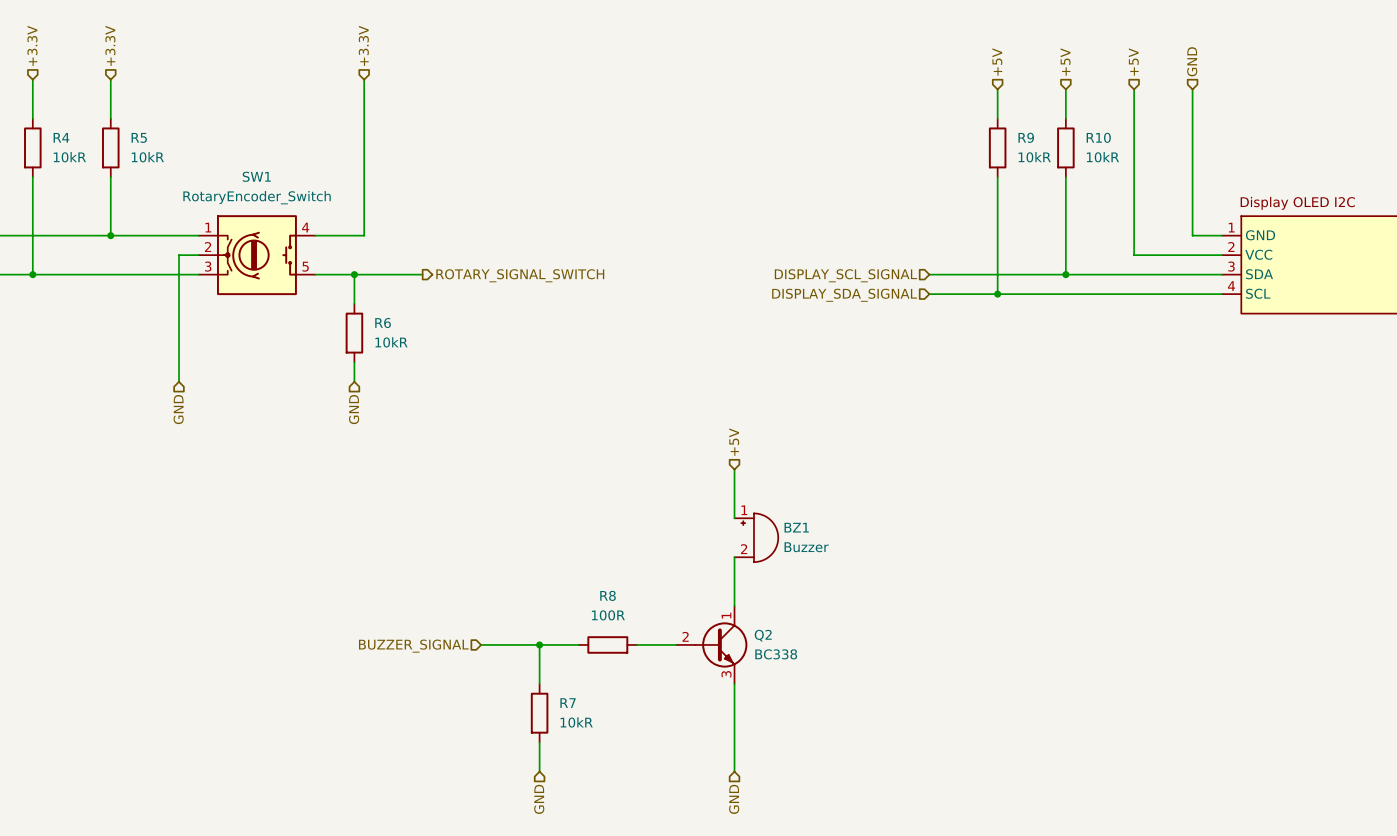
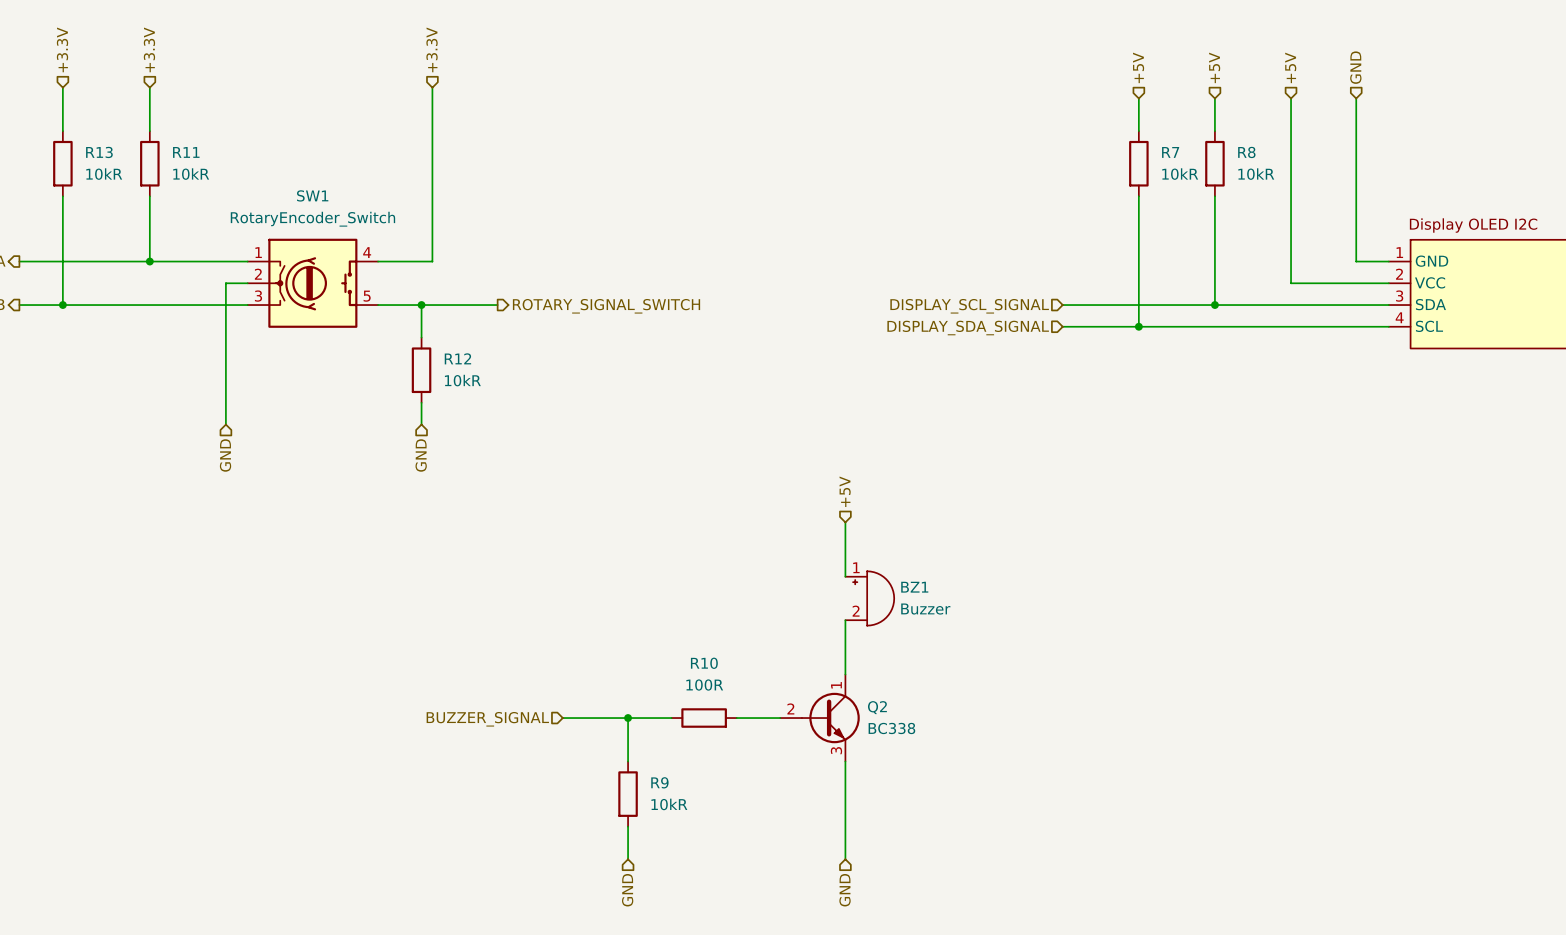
R4 name: R4 (61, 137) -> R13 (99, 152)
R5 name: R5 (139, 137) -> R11 (186, 152)
R9 name: R9 (1026, 137) -> R7 (1170, 152)
R10 name: R10 (1098, 137) -> R8 (1246, 152)
R6 name: R6 (383, 323) -> R12 (457, 358)
R8 name: R8 (608, 595) -> R10 (704, 663)
R7 name: R7 (568, 703) -> R9 (659, 782)

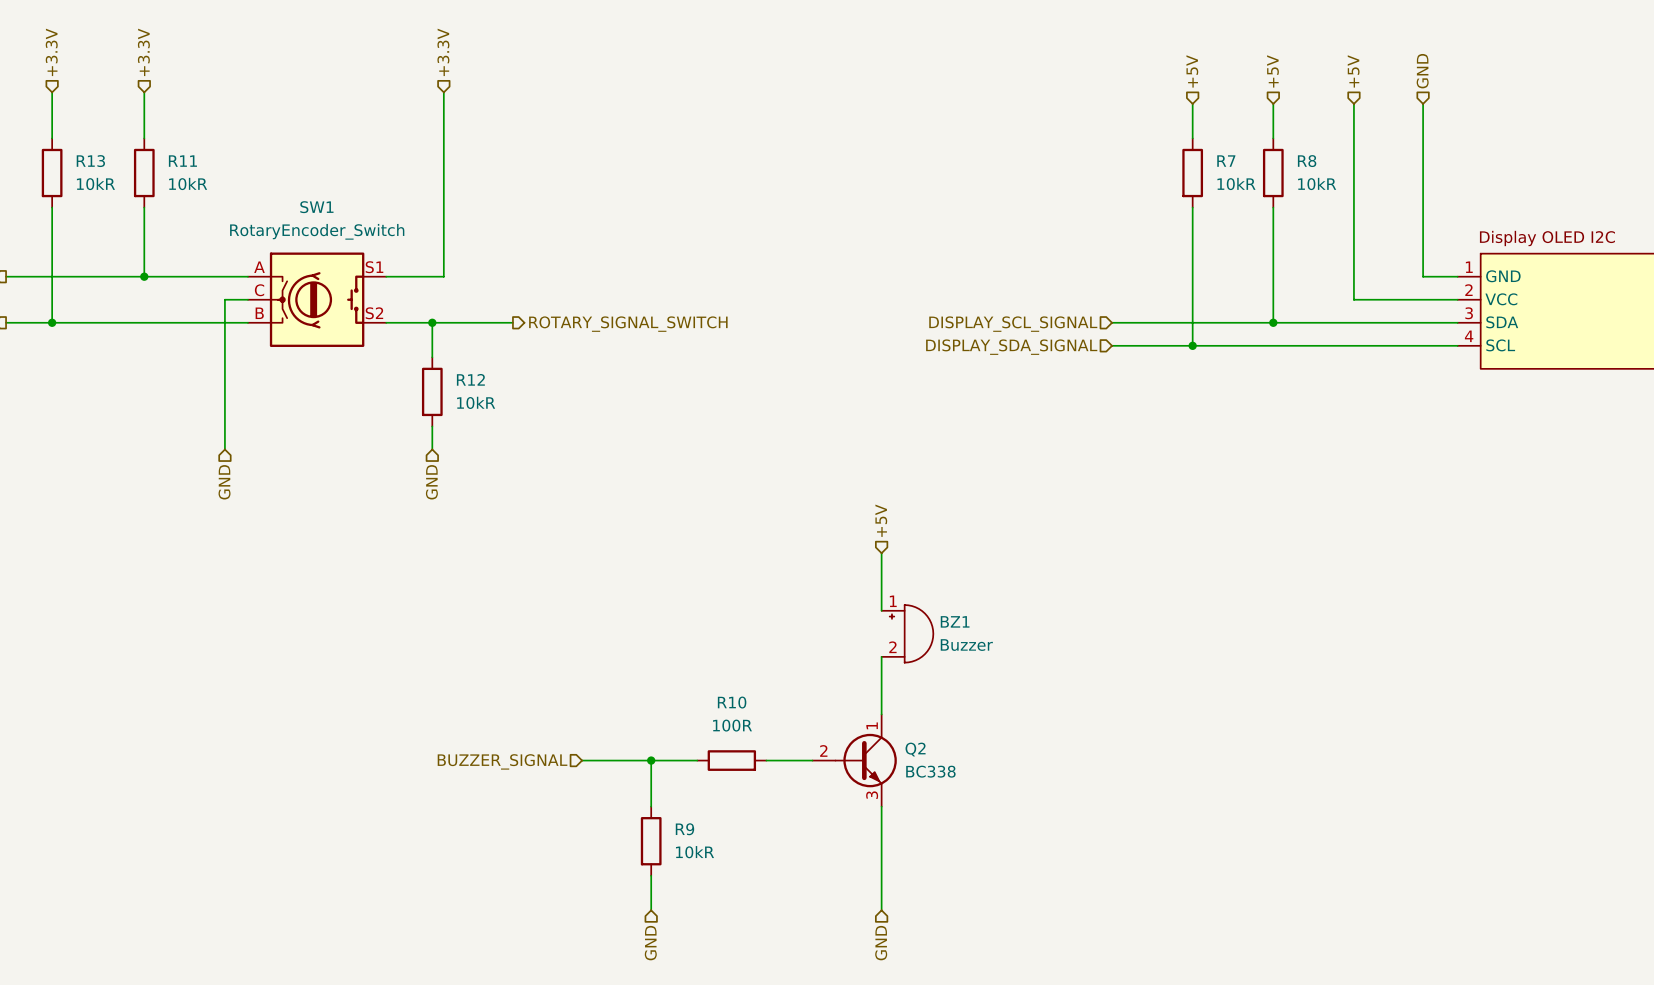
SW1 pin number: 1 (258, 252) -> A (259, 267)
SW1 pin number: 4 (367, 252) -> S1 (374, 267)
SW1 pin number: 2 (258, 274) -> C (259, 290)
SW1 pin number: 3 (258, 296) -> B (259, 313)
SW1 pin number: 5 (367, 296) -> S2 (374, 313)

